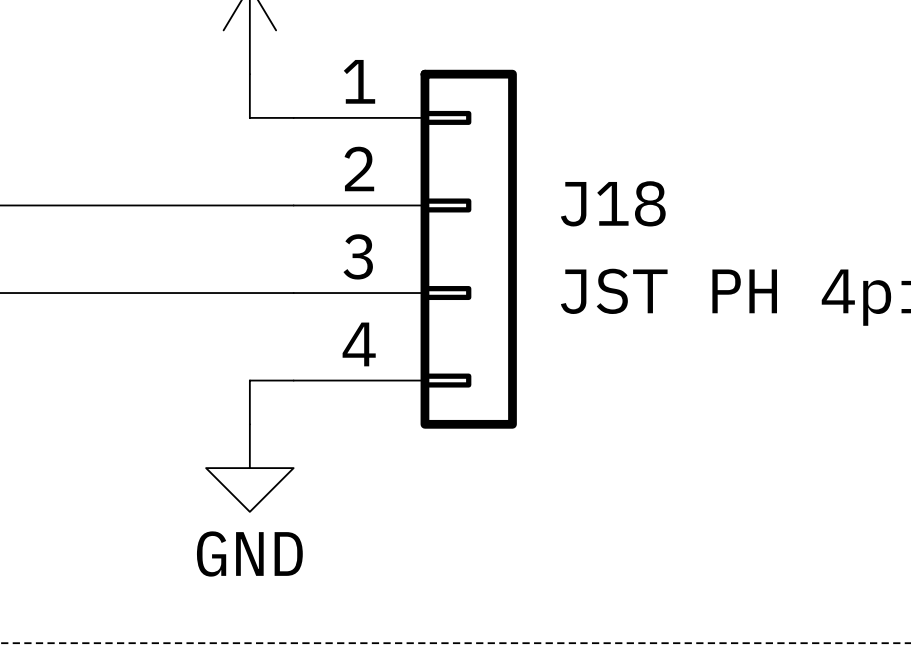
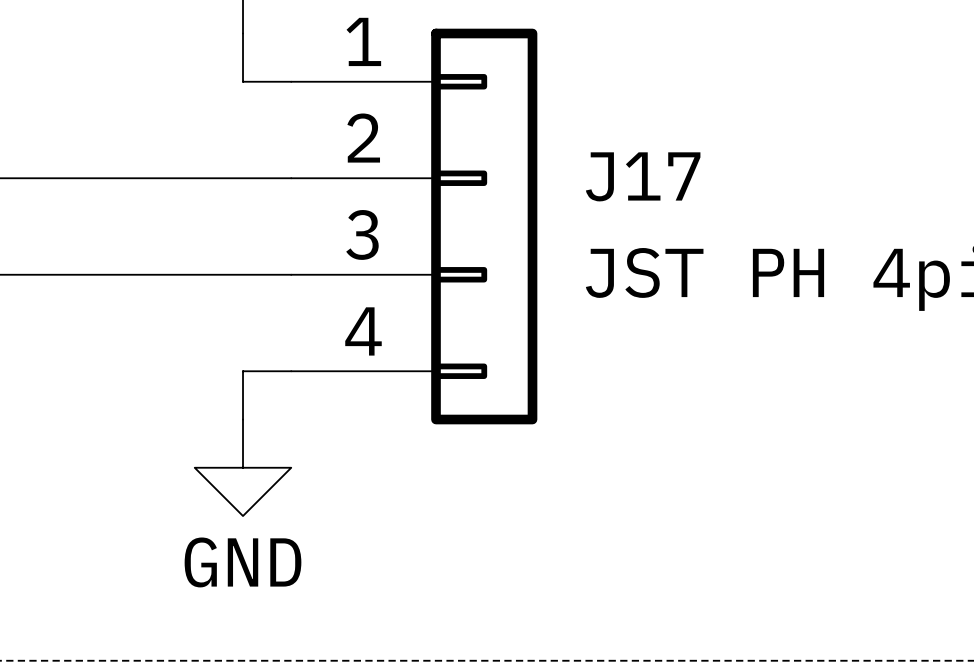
J18 name: J18 (613, 203) -> J17 (643, 176)

